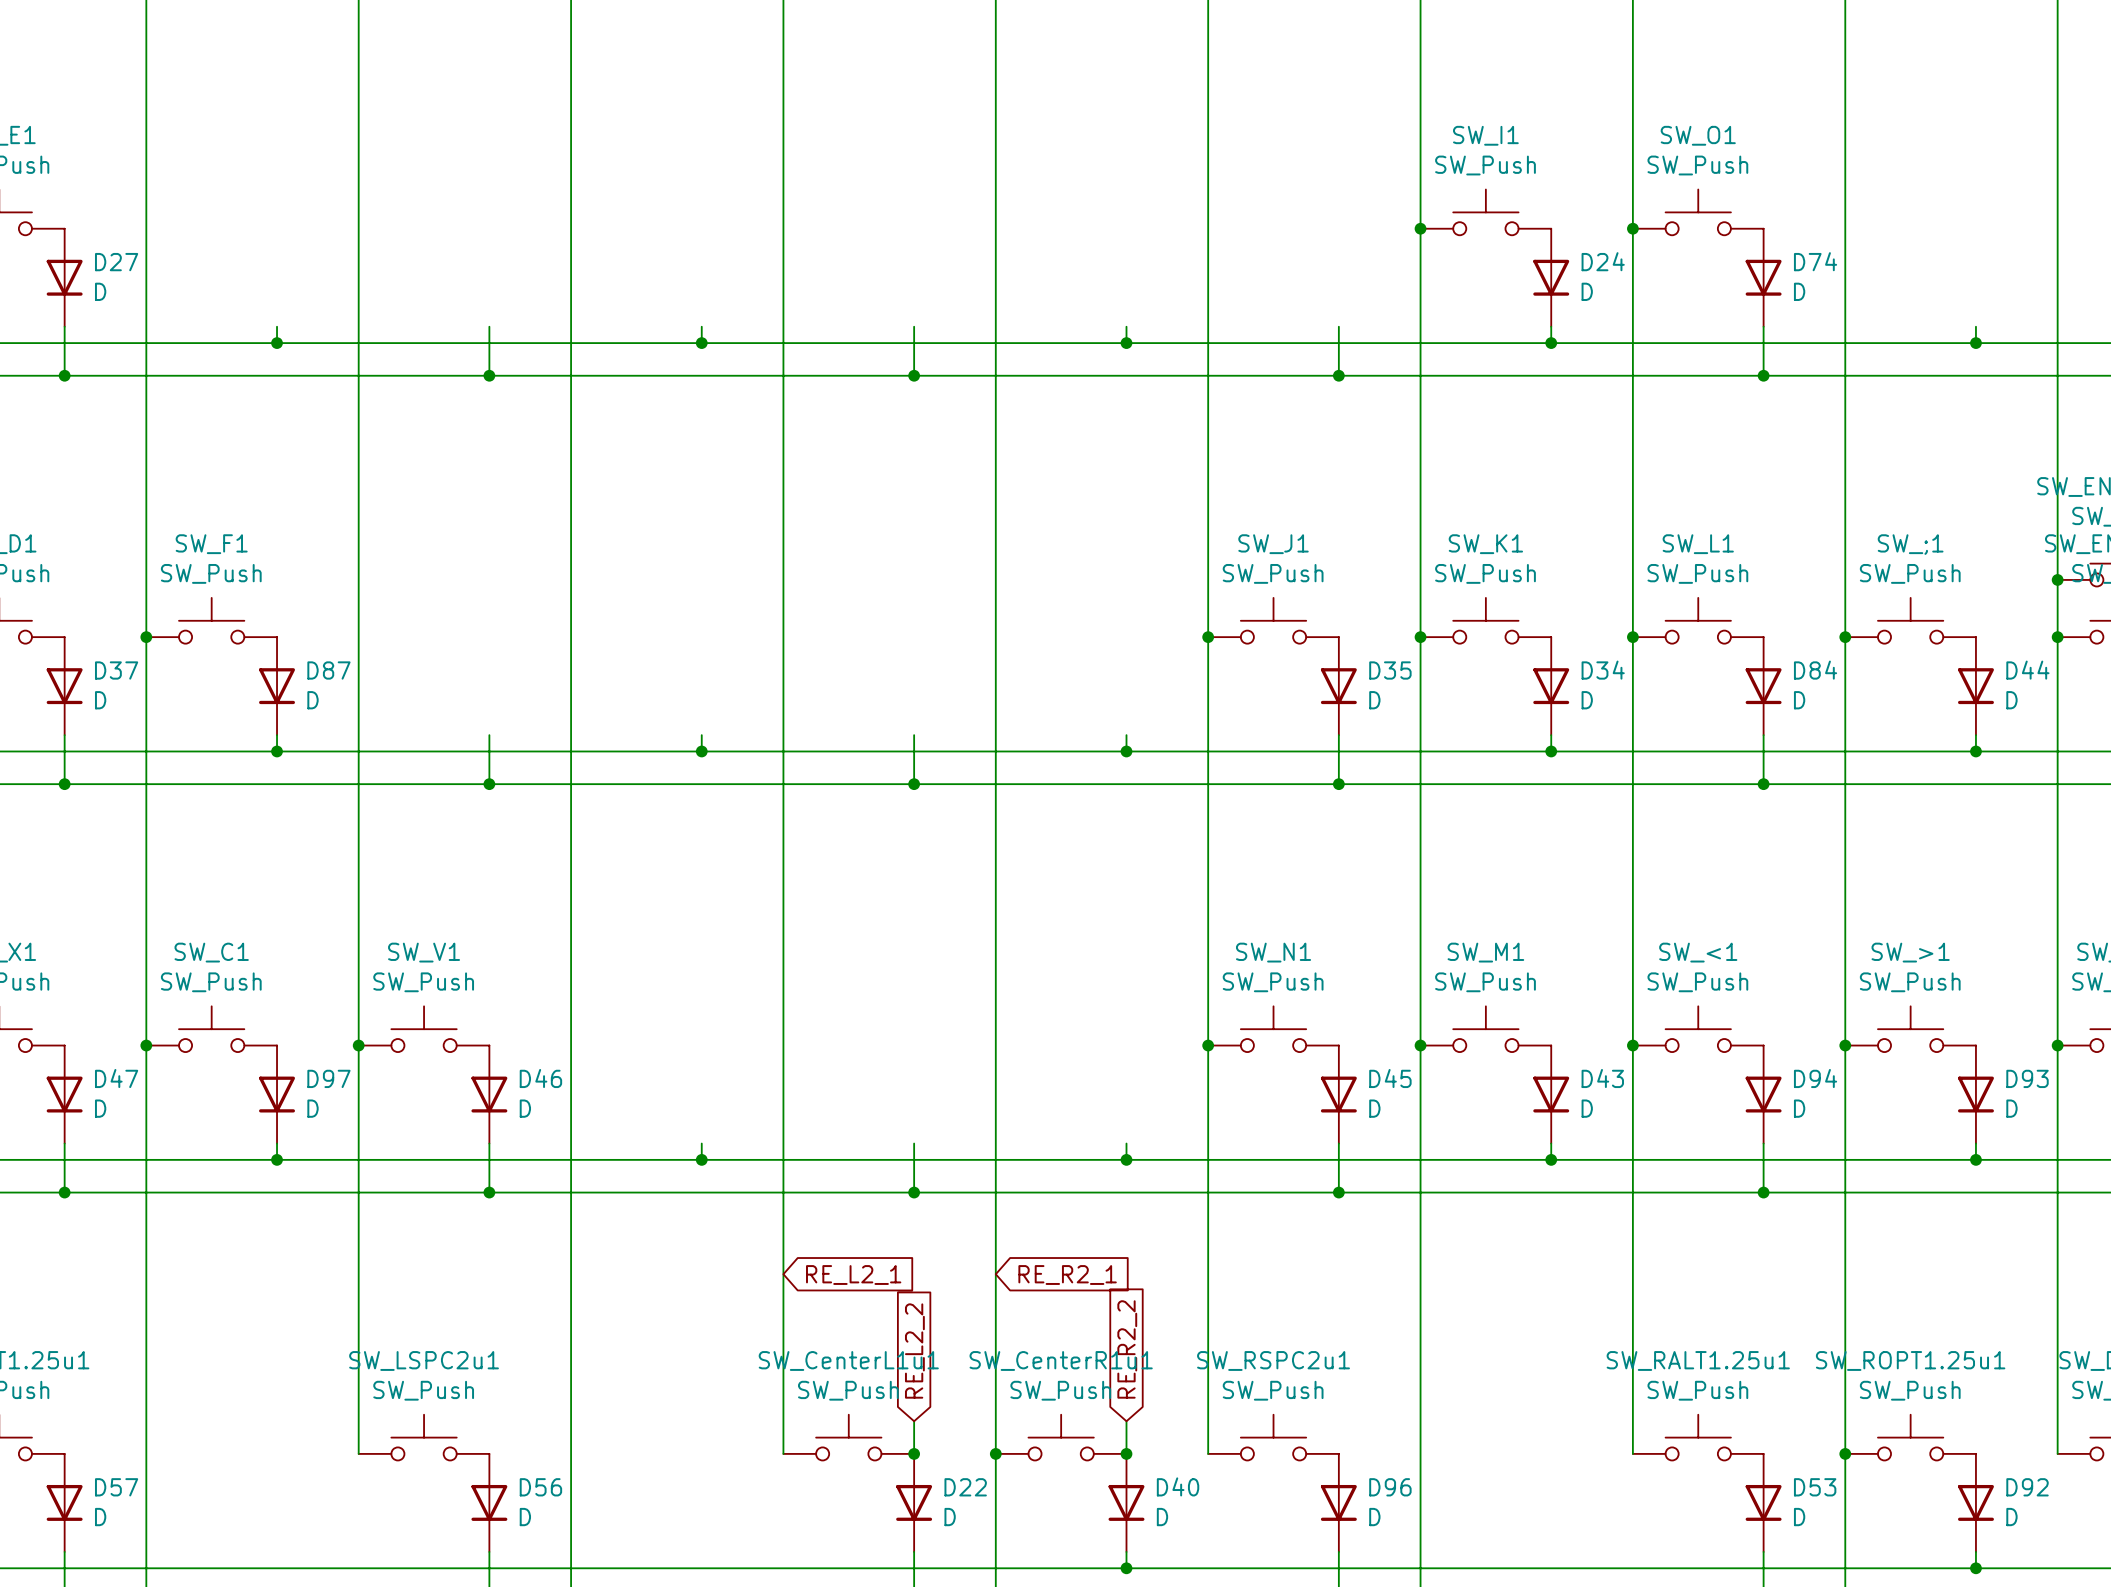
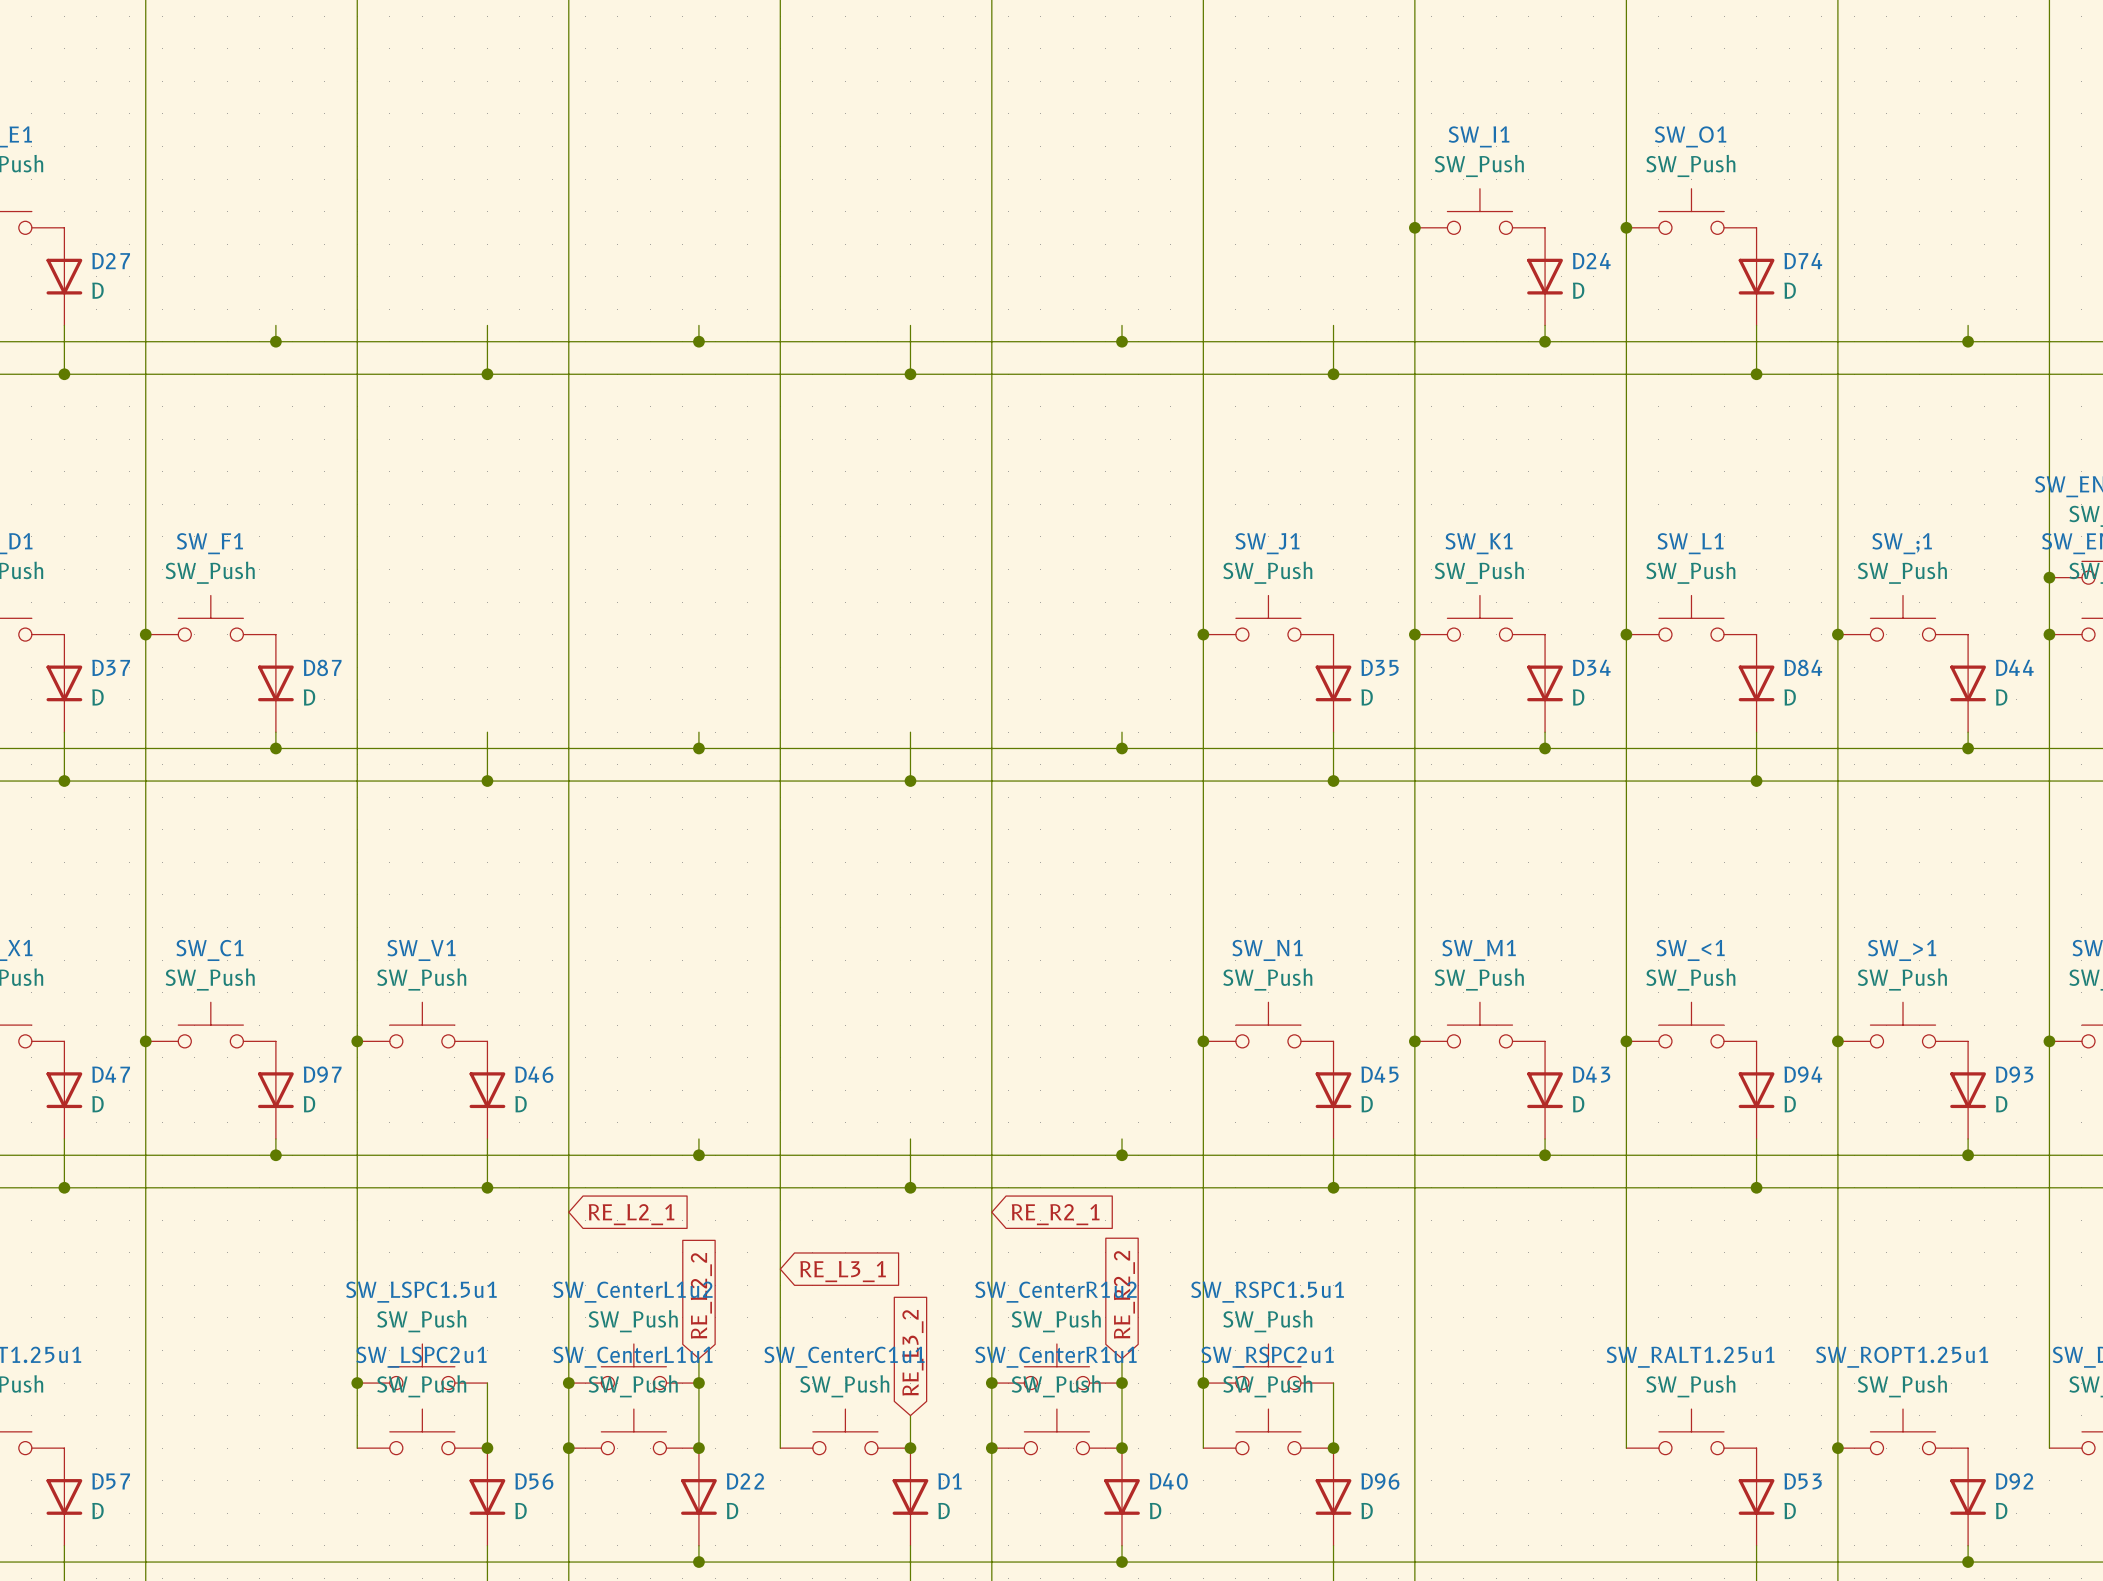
global label: none -> RE_L2_1 (631, 1214)
global label: RE_L2_1 (853, 1275) -> RE_L3_1 (843, 1271)
global label position: RE_R2_1 (1067, 1275) -> RE_R2_1 (1055, 1214)
global label: none -> RE_L2_2 (701, 1295)
global label position: RE_R2_2 (1127, 1349) -> RE_R2_2 (1124, 1294)
global label: RE_L2_2 (914, 1351) -> RE_L3_2 (912, 1352)
SW_CenterL1u1 name: SW_CenterL1u1 (848, 1360) -> SW_CenterC1u1 (844, 1357)
wire: none -> (698, 1358) (698, 1448)
wire: none -> (1121, 1358) (1121, 1415)
SW_LSPC1.5u1: none -> SW_Push (422, 1366)
SW_CenterL1u2: none -> SW_Push (633, 1366)
SW_CenterR1u2: none -> SW_Push (1056, 1366)
SW_RSPC1.5u1: none -> SW_Push (1268, 1366)
junction: none -> (357, 1383)
wire: none -> (487, 1383) (487, 1448)
junction: none -> (568, 1383)
junction: none -> (698, 1383)
junction: none -> (991, 1383)
junction: none -> (1121, 1383)
junction: none -> (1203, 1383)
wire: none -> (1333, 1383) (1333, 1448)
SW_CenterL1u1: none -> SW_Push (633, 1431)
junction: none -> (487, 1448)
junction: none -> (568, 1448)
junction: none -> (698, 1448)
junction: none -> (1333, 1448)
D22 name: D22 (965, 1487) -> D1 (949, 1481)
D22: none -> D (698, 1496)
wire: none -> (698, 1545) (698, 1562)
junction: none -> (698, 1562)

